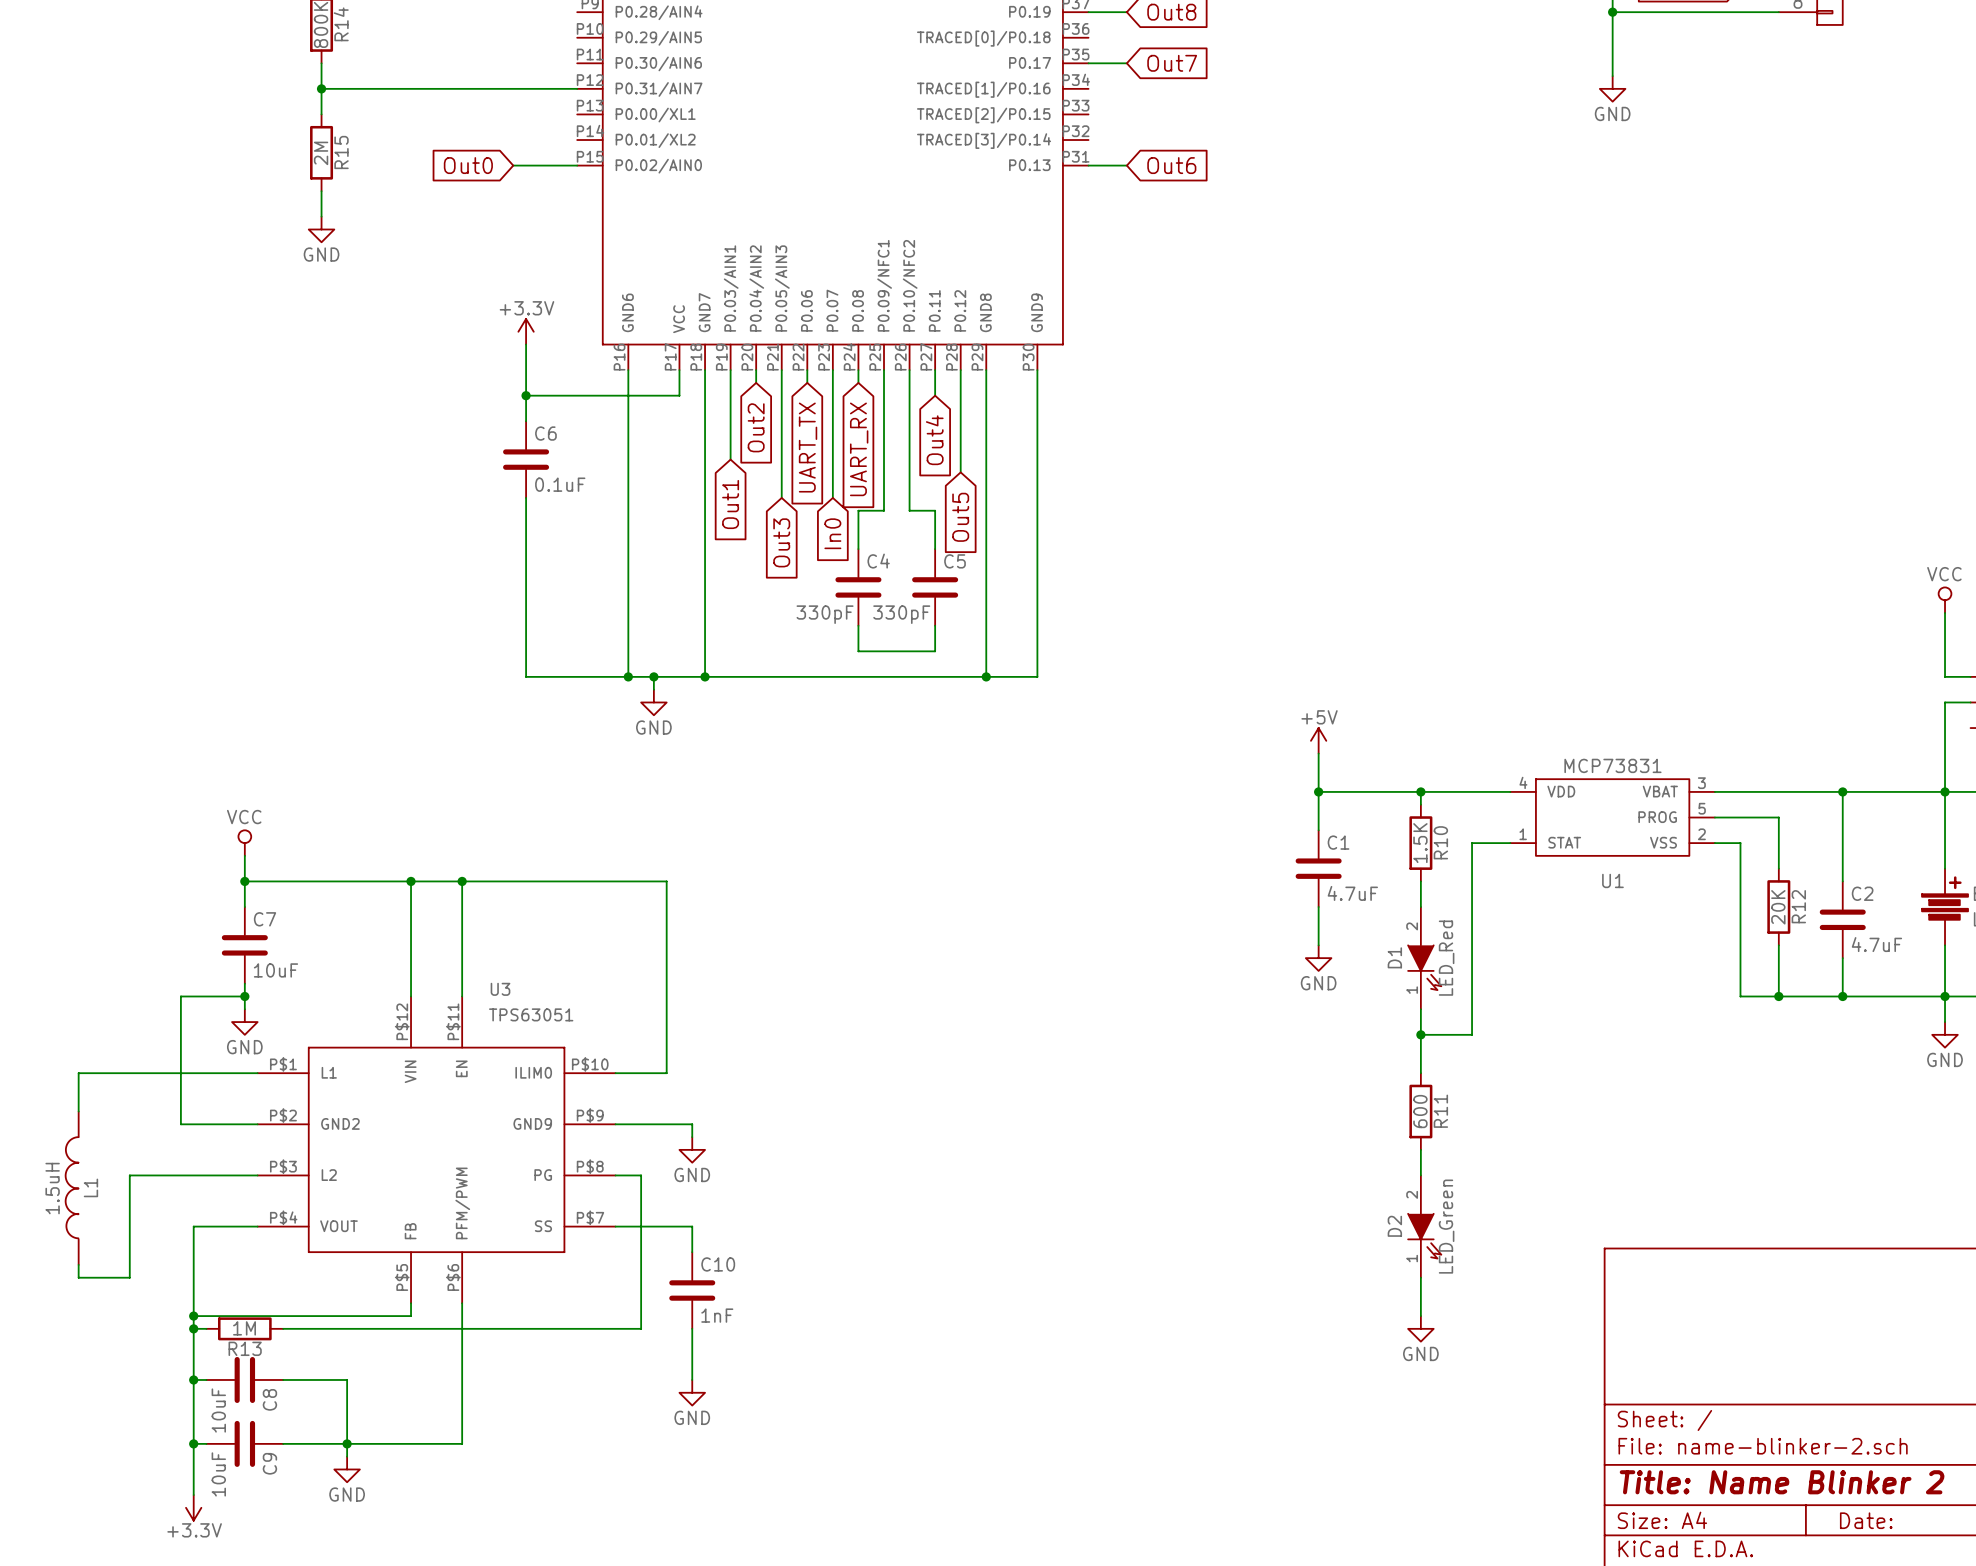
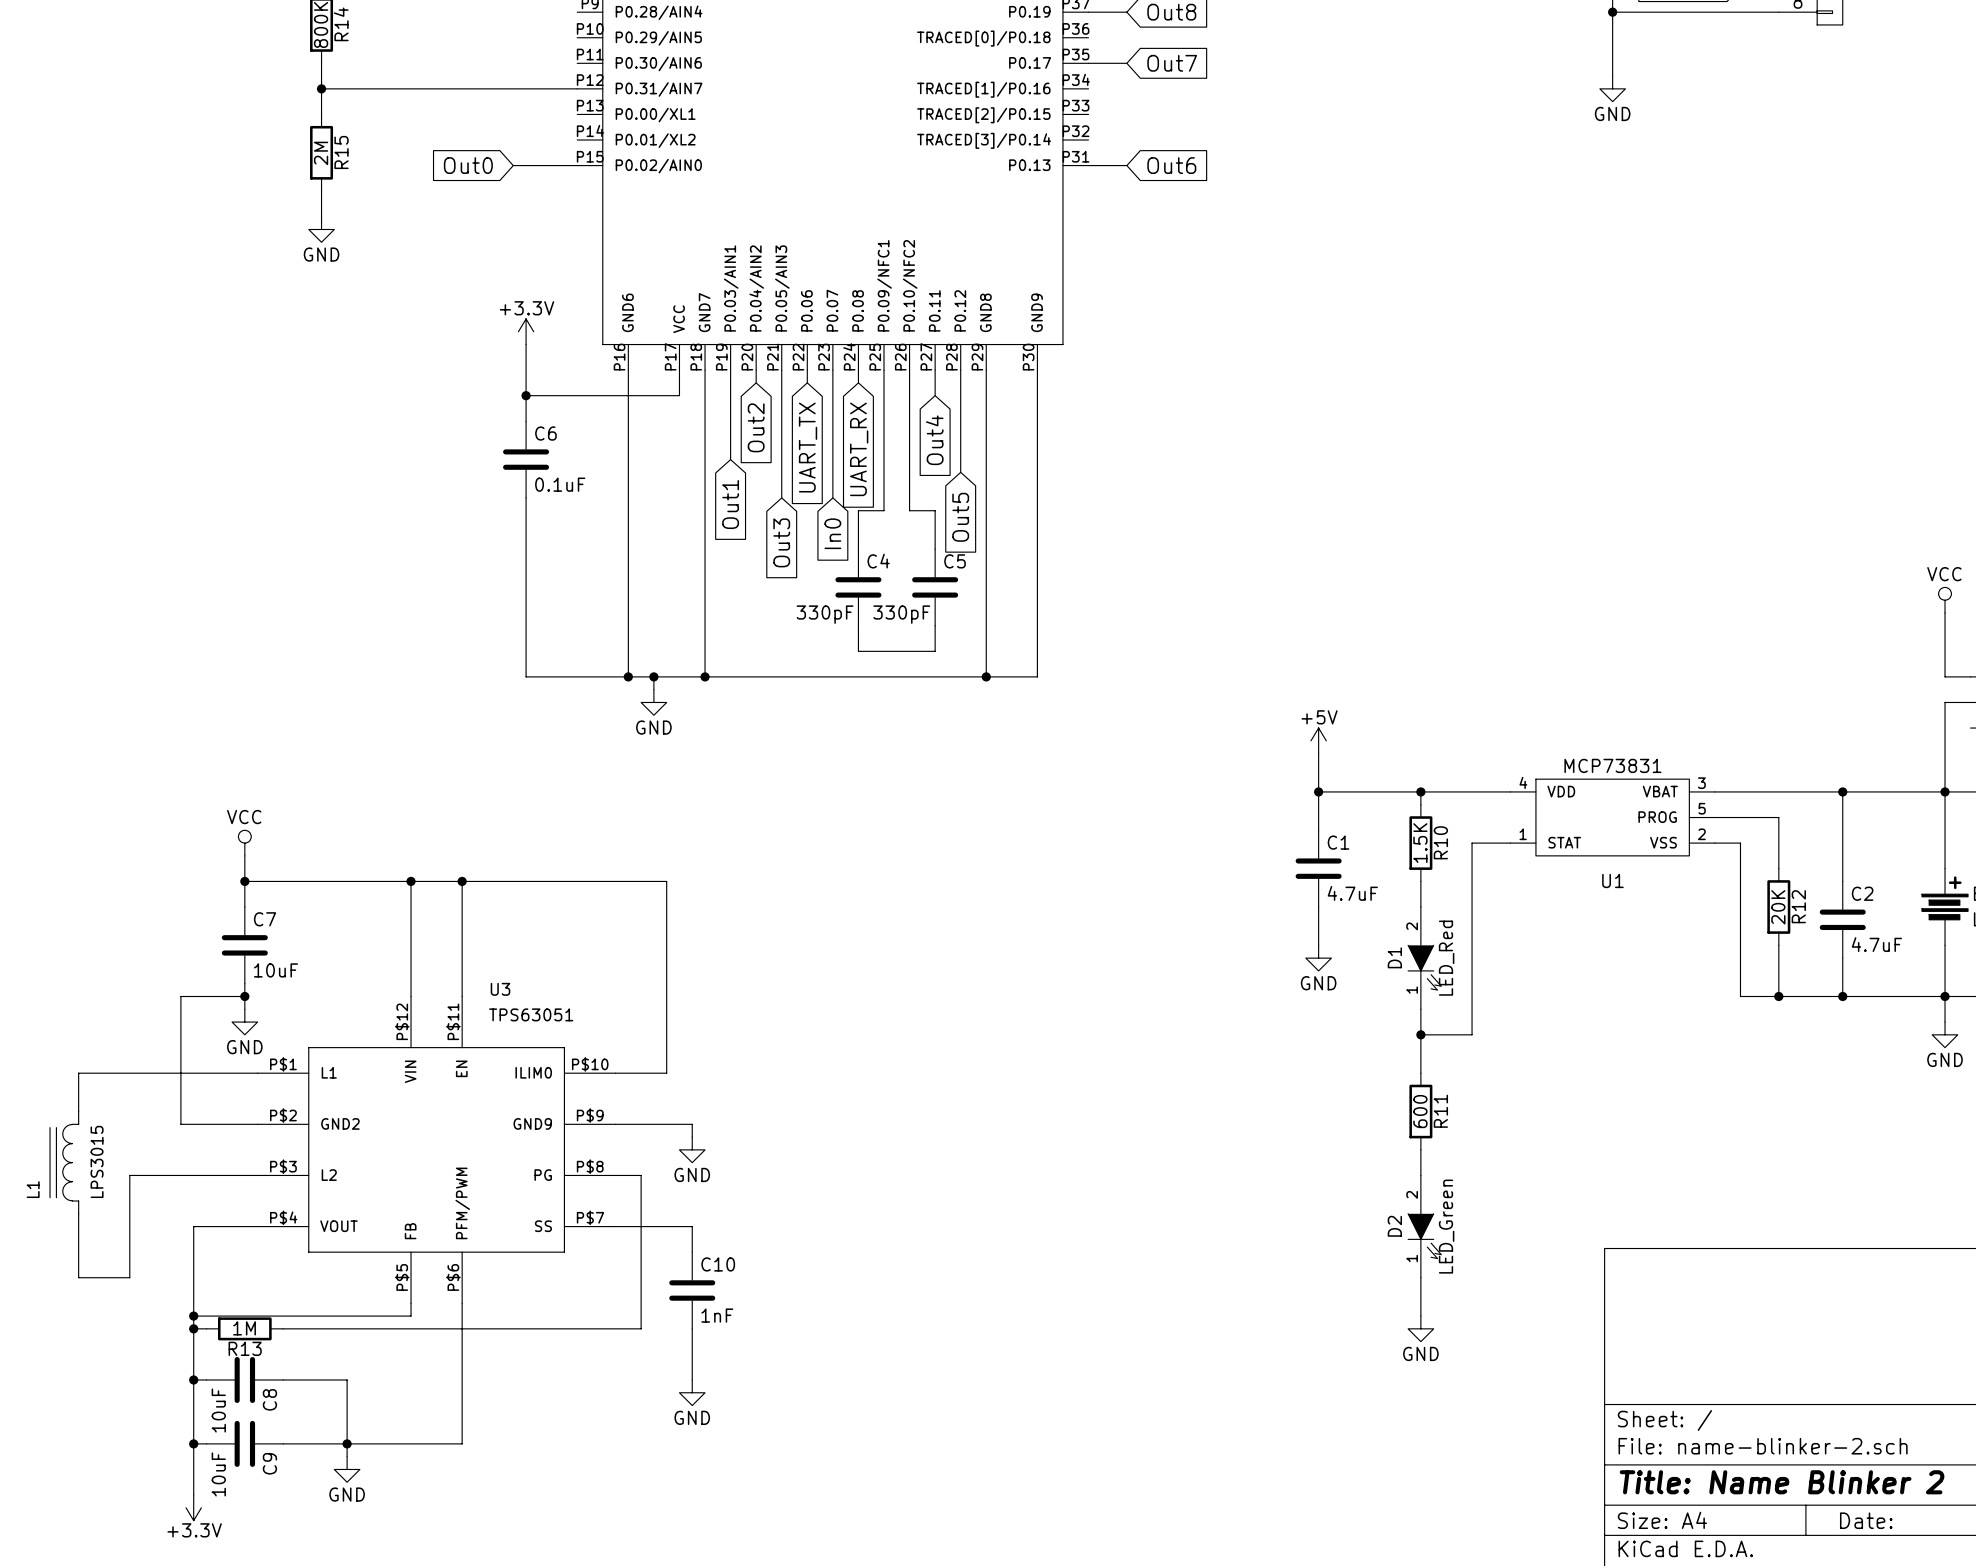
L1 symbol: [65, 1111, 79, 1265] -> [50, 1111, 79, 1214]
L1 name position: L1 (90, 1187) -> L1 (33, 1189)
L1 value: 1.5uH (52, 1188) -> LPS3015 (97, 1161)
wire: none -> (78, 1213) (78, 1264)

